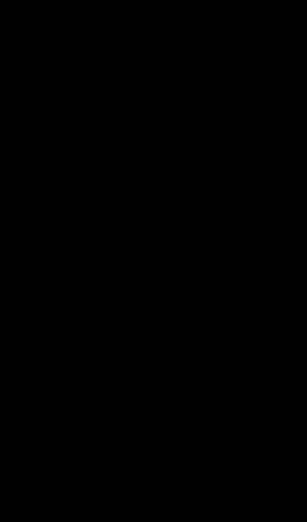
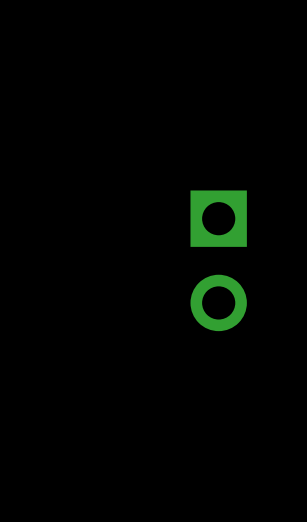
part: none -> (218, 260)

